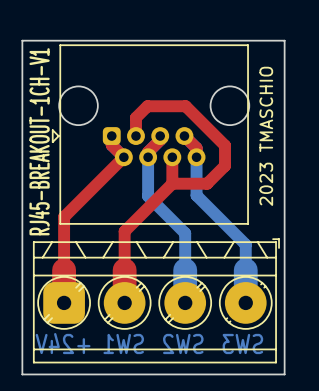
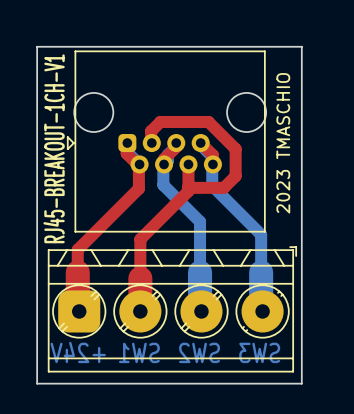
top track: (111, 136) (111, 145) (123, 157) (64, 217) (64, 302) -> none
top track: (135, 136) (135, 117) (147, 106) (185, 106) (225, 145) (225, 165) (207, 183) (172, 183) -> none
bottom track: (160, 136) (160, 140) (148, 152) (148, 196) (185, 233) (185, 302) -> none
bottom track: (184, 136) (196, 148) (196, 195) (245, 244) (245, 302) -> none
top track: none -> (126, 144) (126, 153) (138, 165) (138, 188) (77, 249) (77, 311)
top track: none -> (151, 144) (151, 131) (160, 121) (208, 121) (235, 149) (235, 176) (223, 187) (187, 187)
bottom track: none -> (175, 144) (175, 147) (167, 155) (167, 161) (163, 165) (163, 185) (200, 221) (200, 311)
bottom track: none -> (200, 144) (212, 156) (212, 185) (261, 234) (261, 311)

